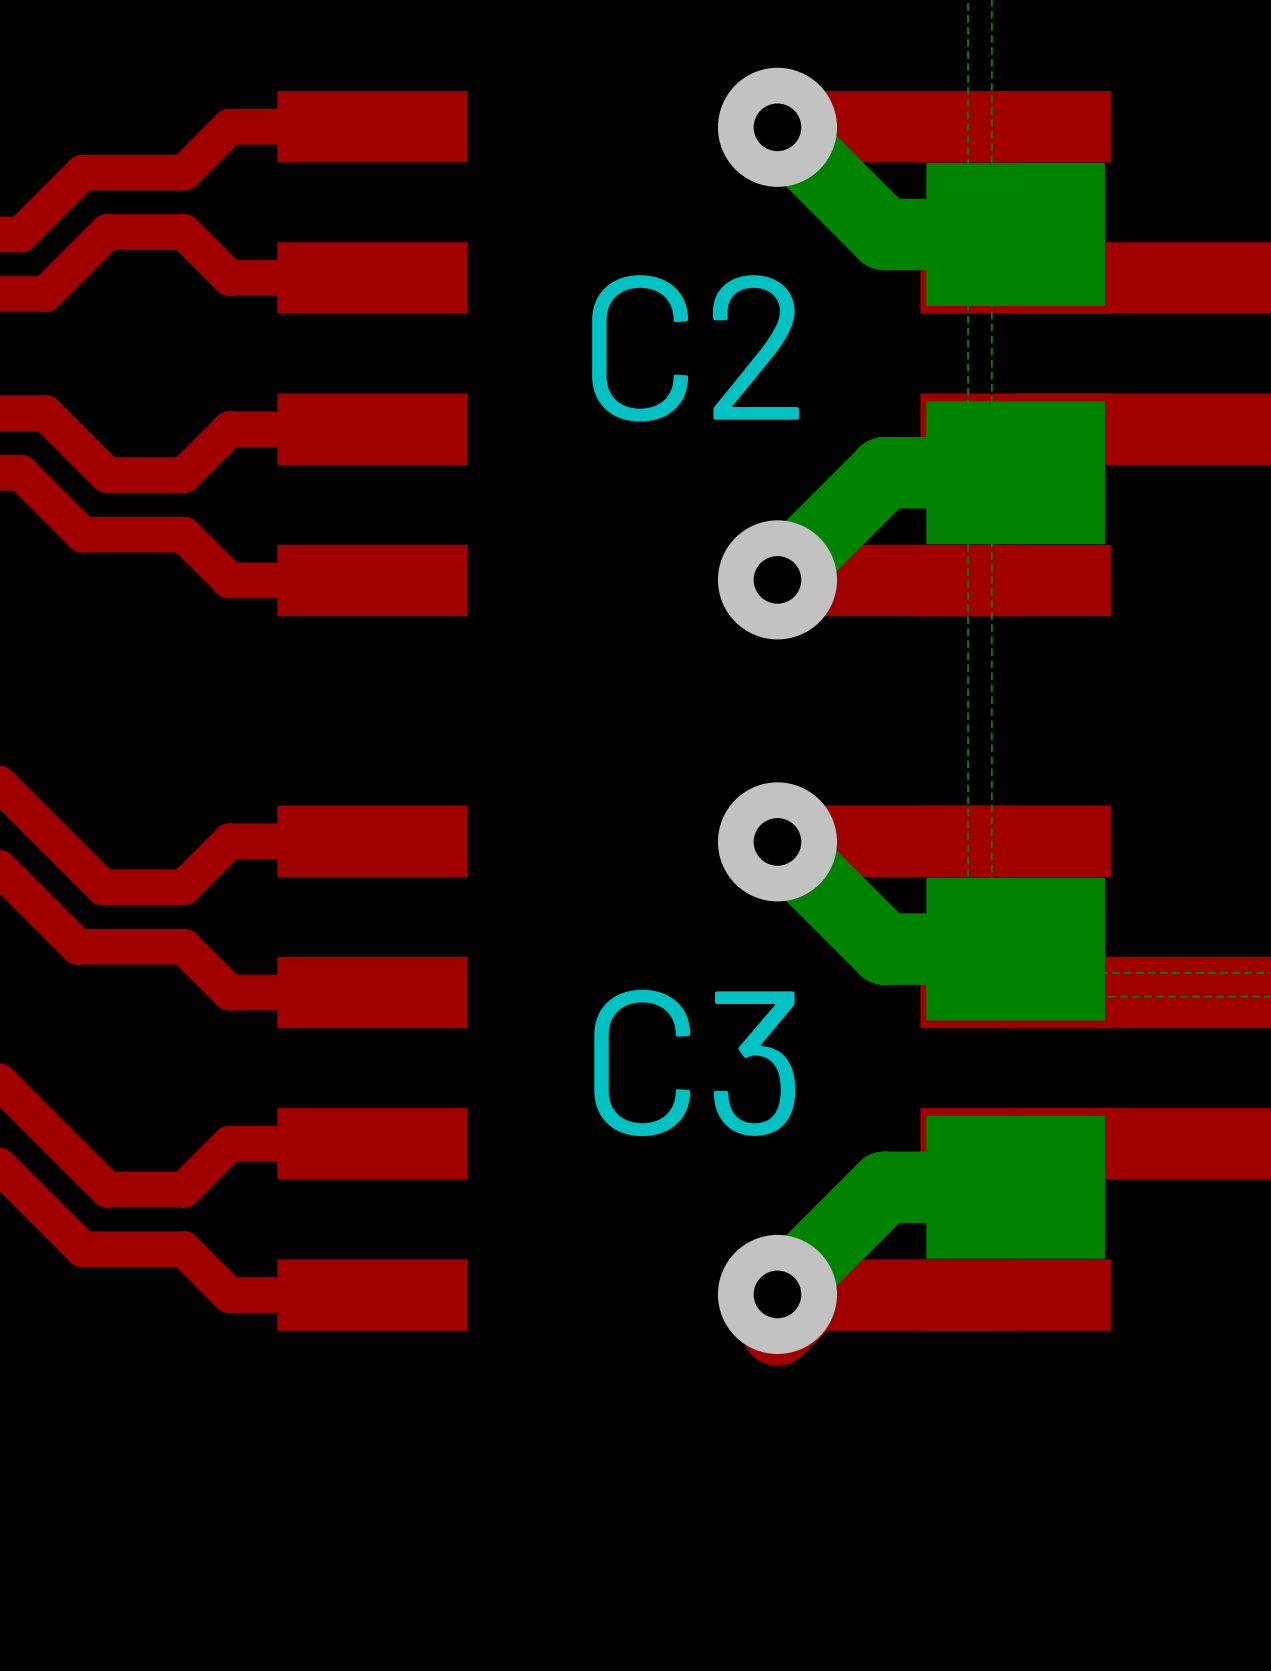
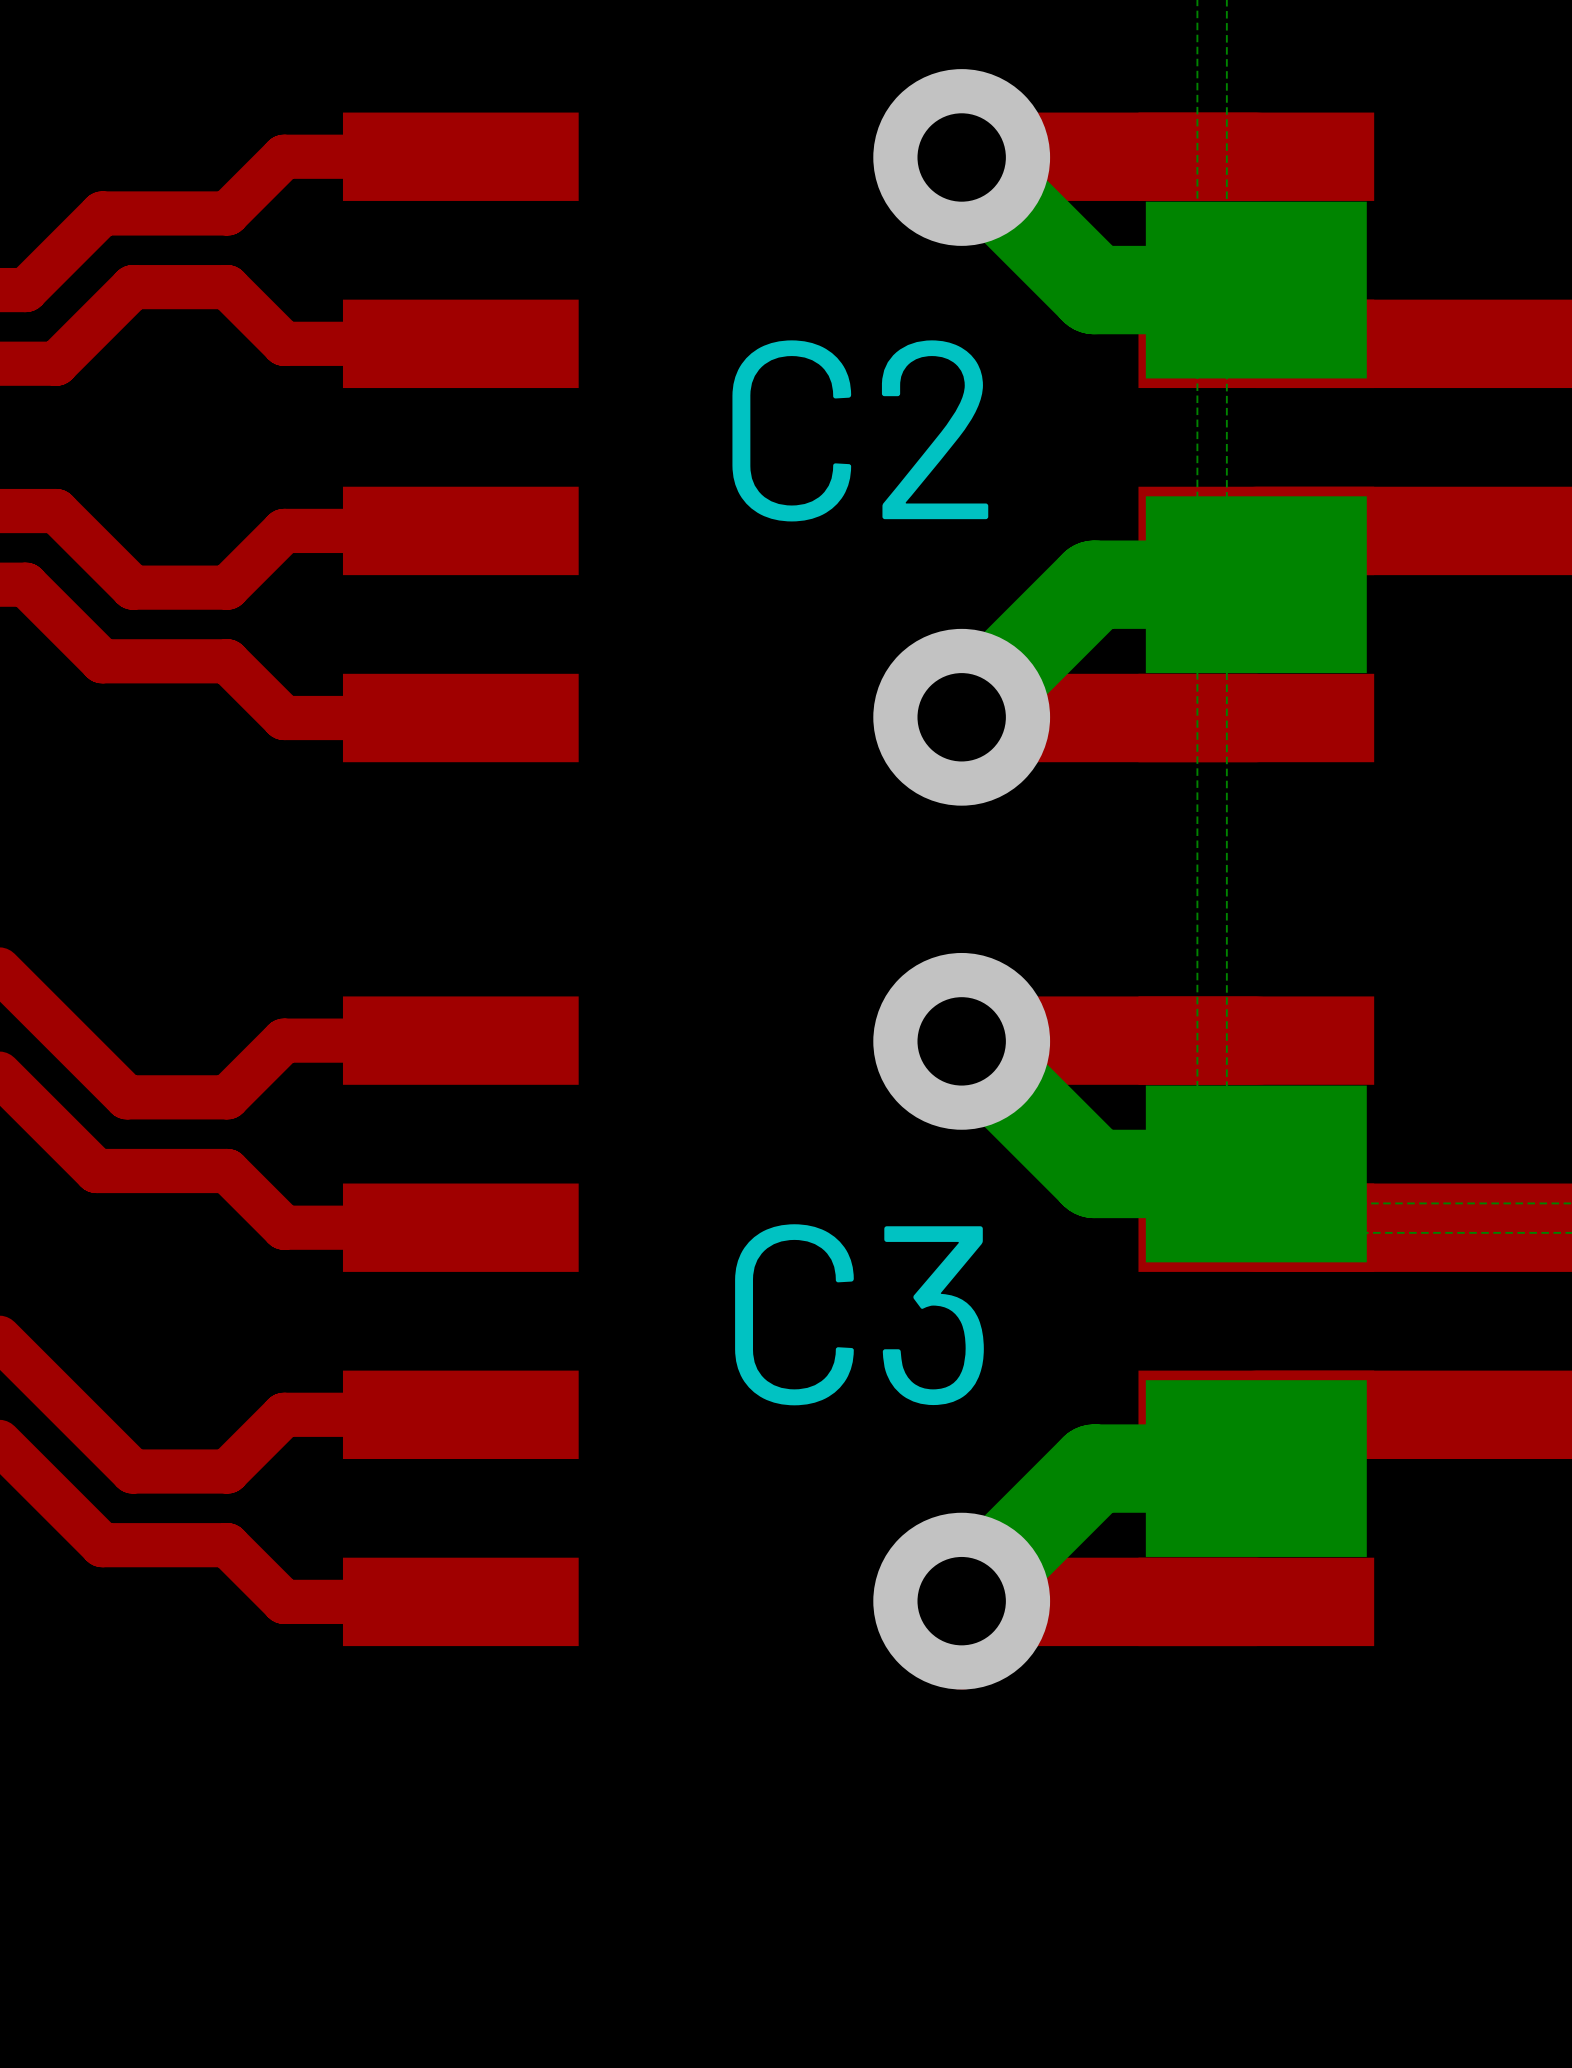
via size: [717, 67, 838, 187] -> [873, 69, 1051, 246]
via size: [717, 520, 838, 640] -> [873, 628, 1051, 806]
via size: [717, 782, 838, 902] -> [873, 952, 1051, 1130]
via size: [717, 1234, 838, 1354] -> [873, 1512, 1051, 1690]

